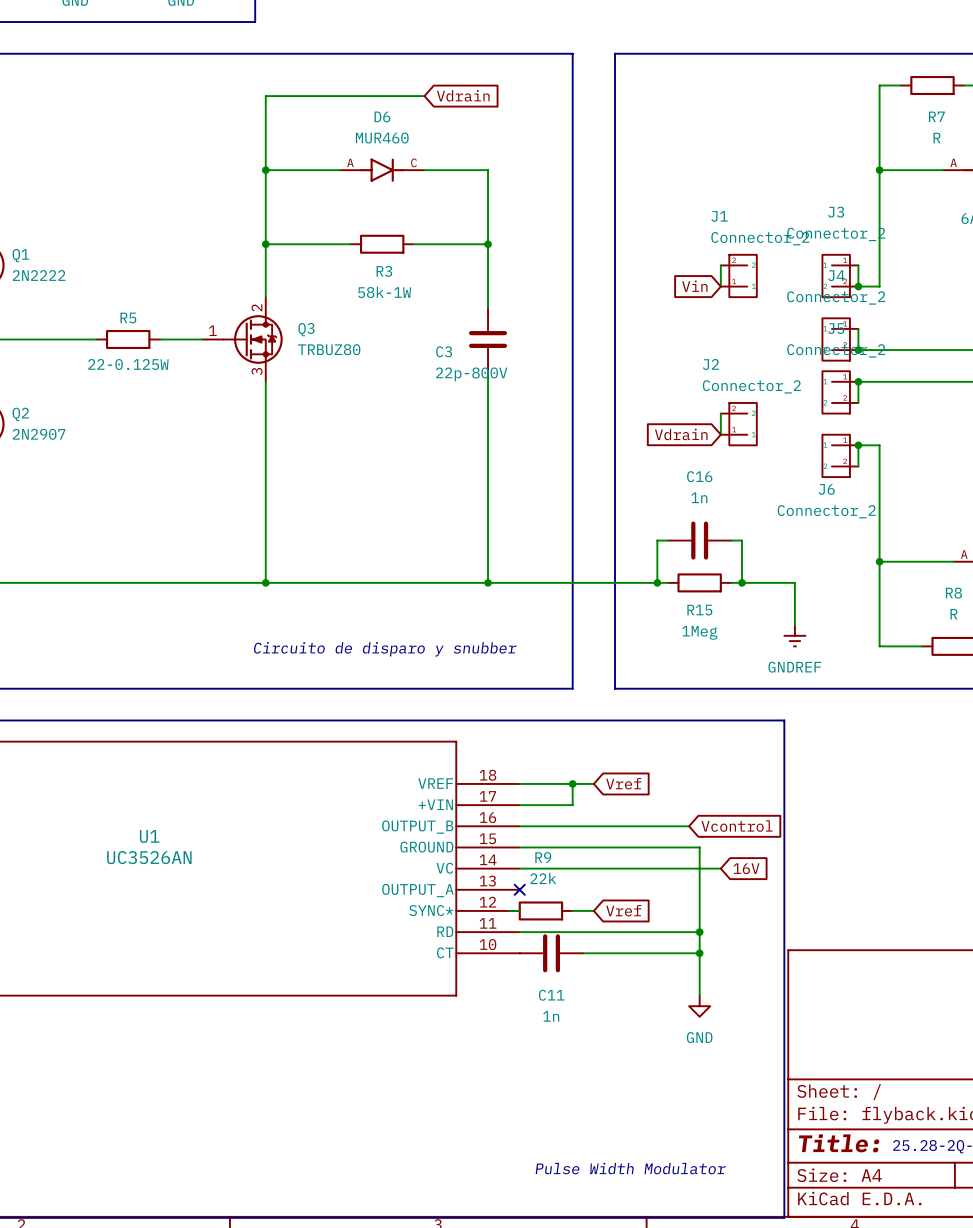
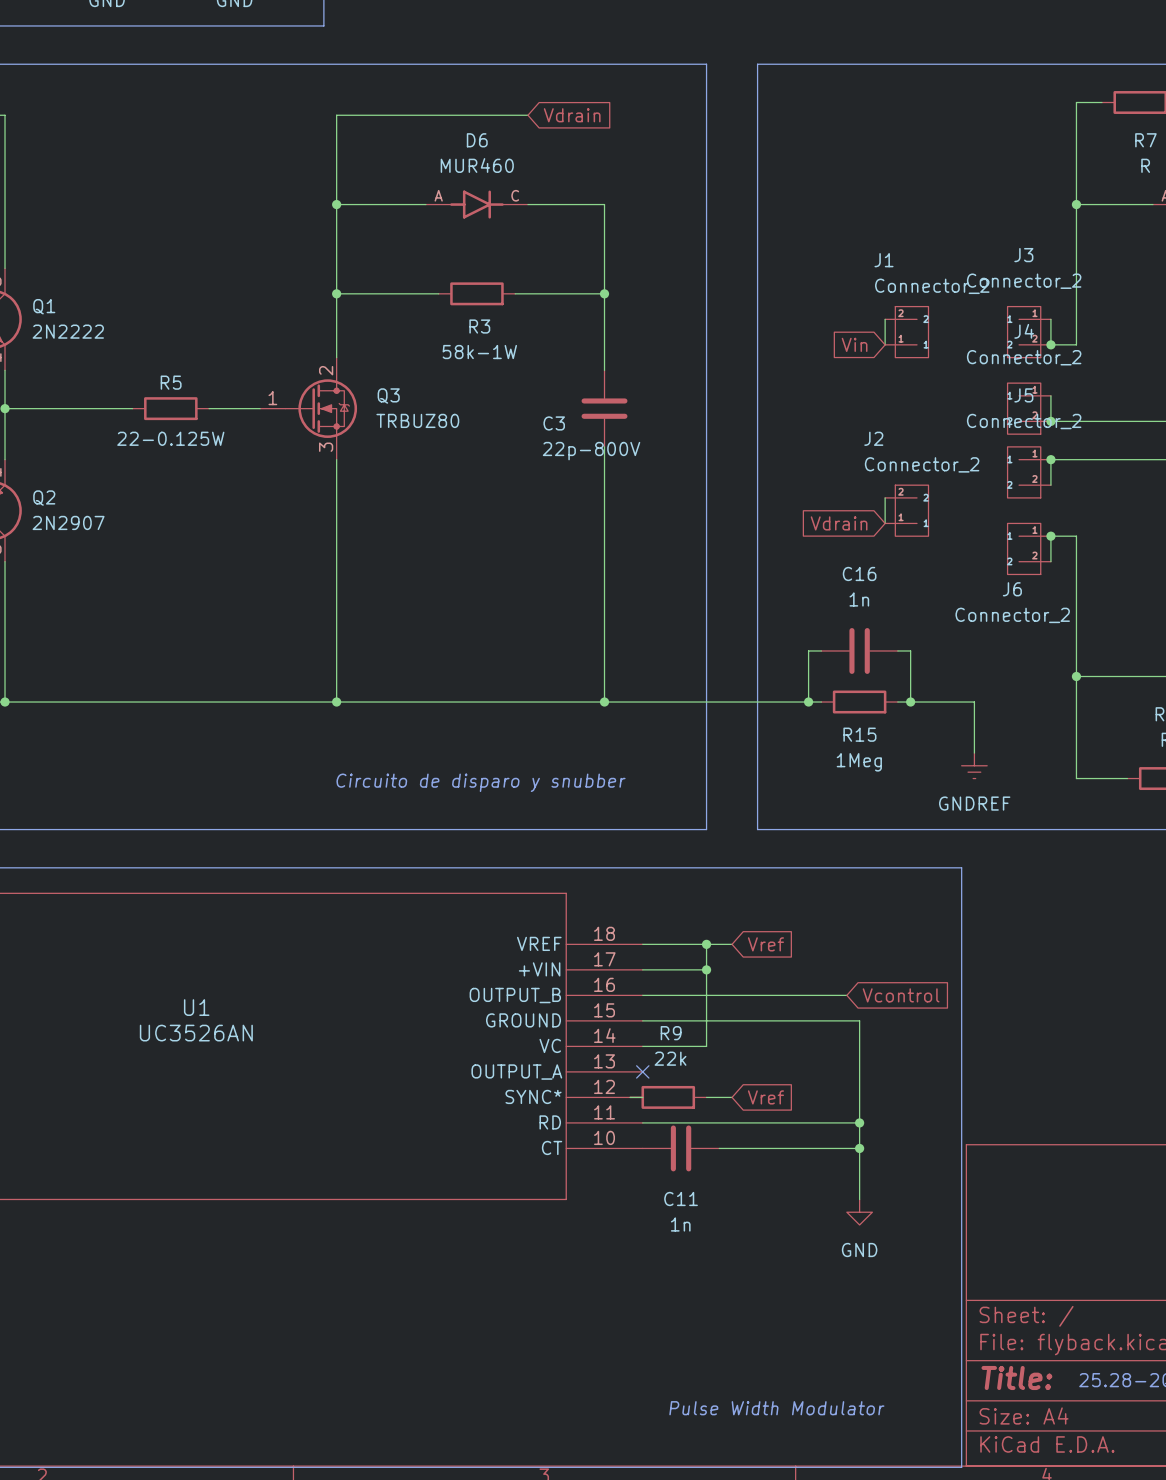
junction: none -> (706, 969)
wire: (572, 868) (720, 868) -> (706, 1046) (706, 969)
global label: 16V (746, 868) -> none

